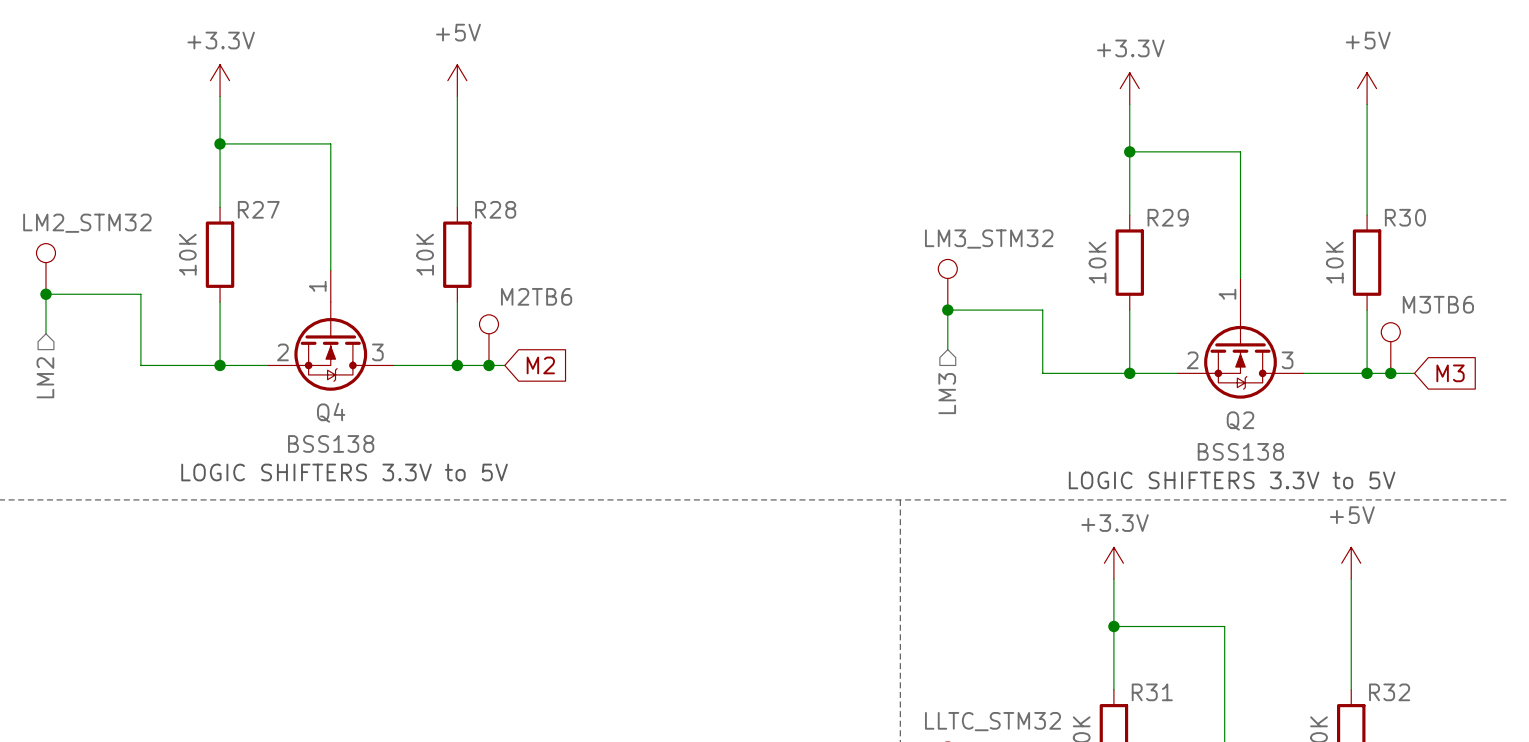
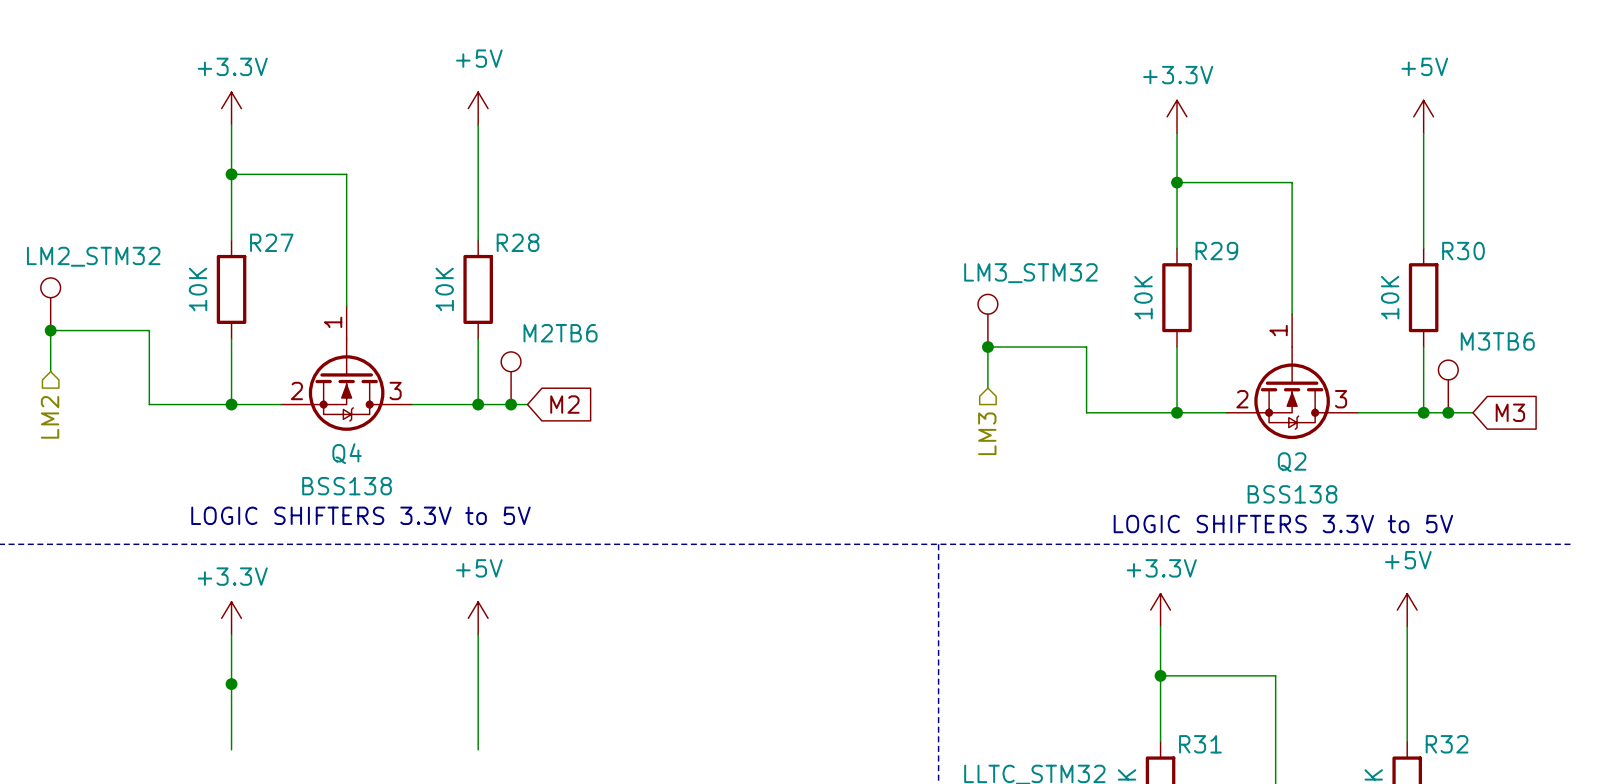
power symbol: none -> +3.3V (231, 618)
power symbol: none -> +5V (478, 618)
wire: none -> (231, 634) (231, 749)
wire: none -> (478, 634) (478, 749)
junction: none -> (231, 684)

